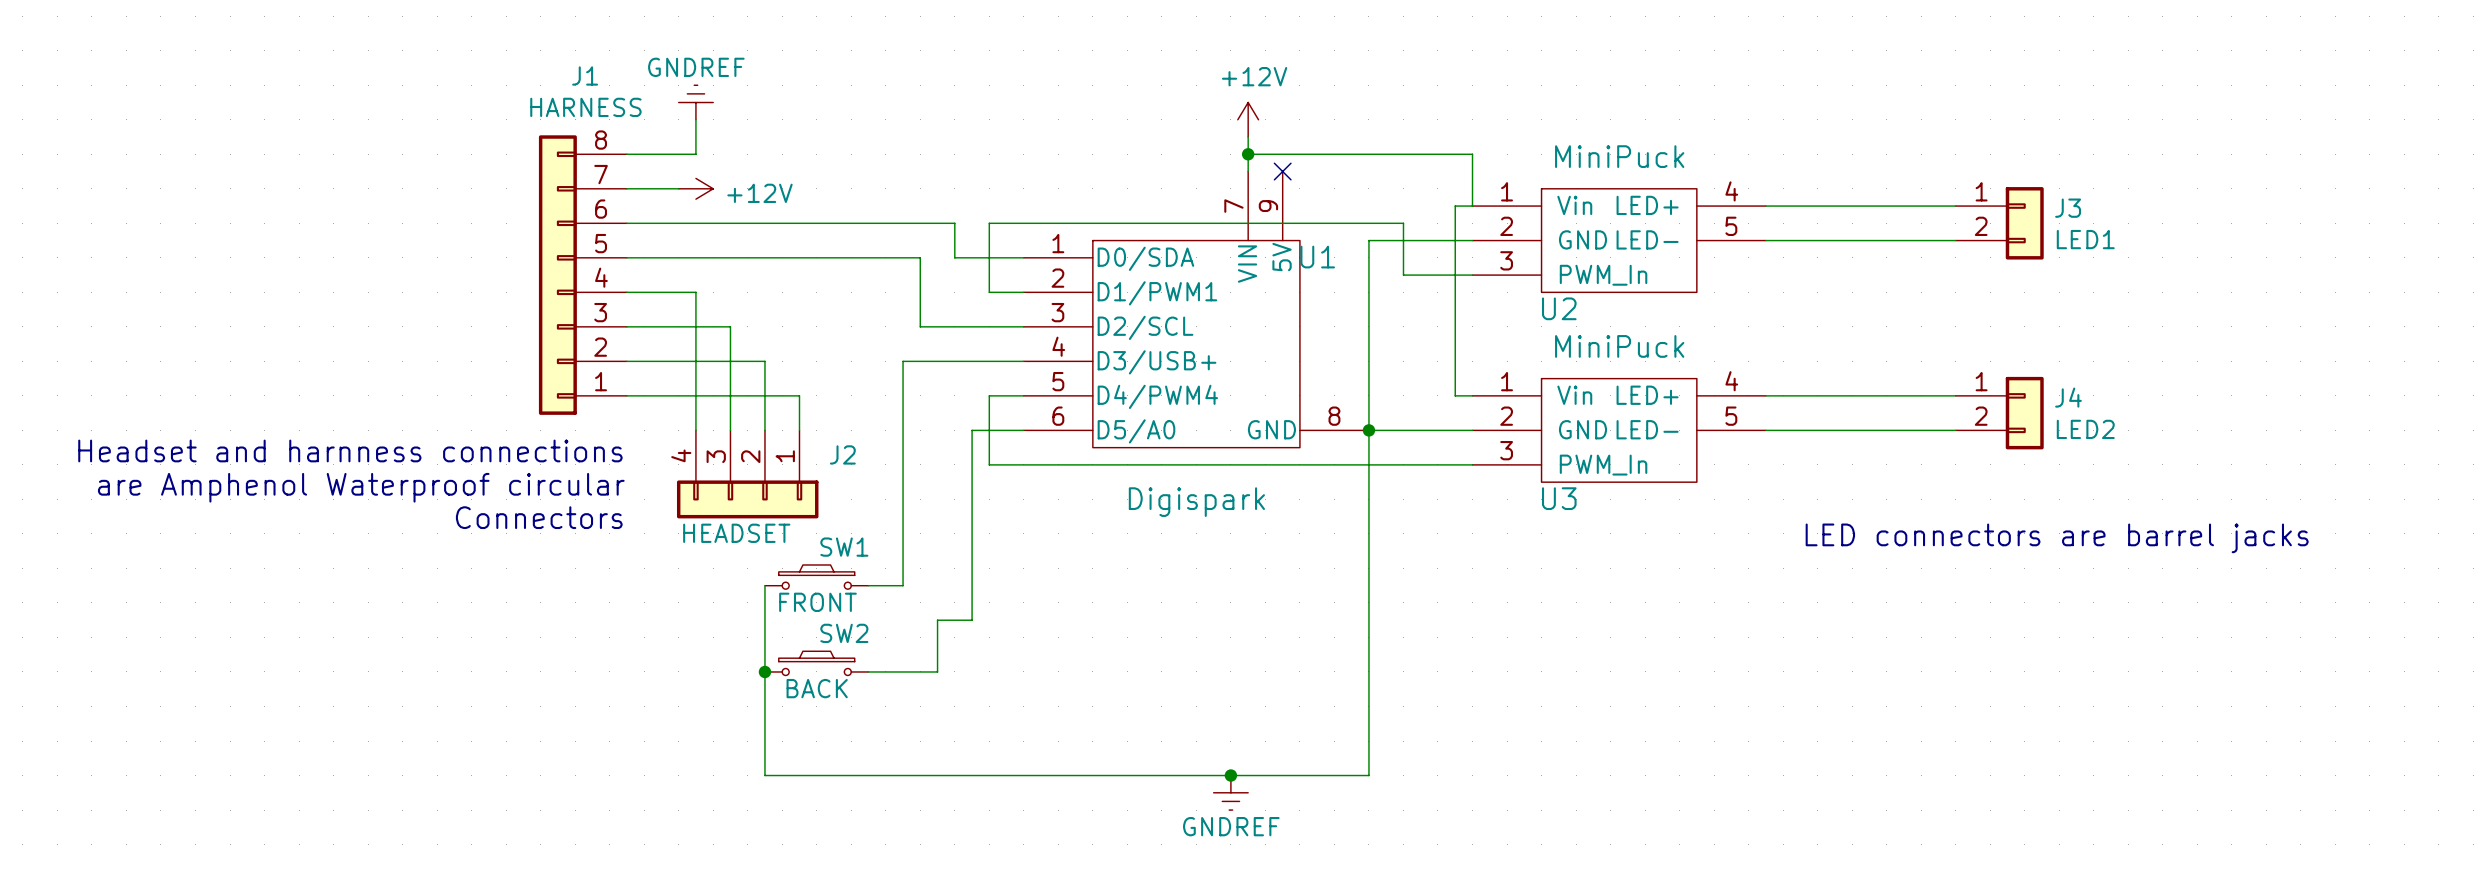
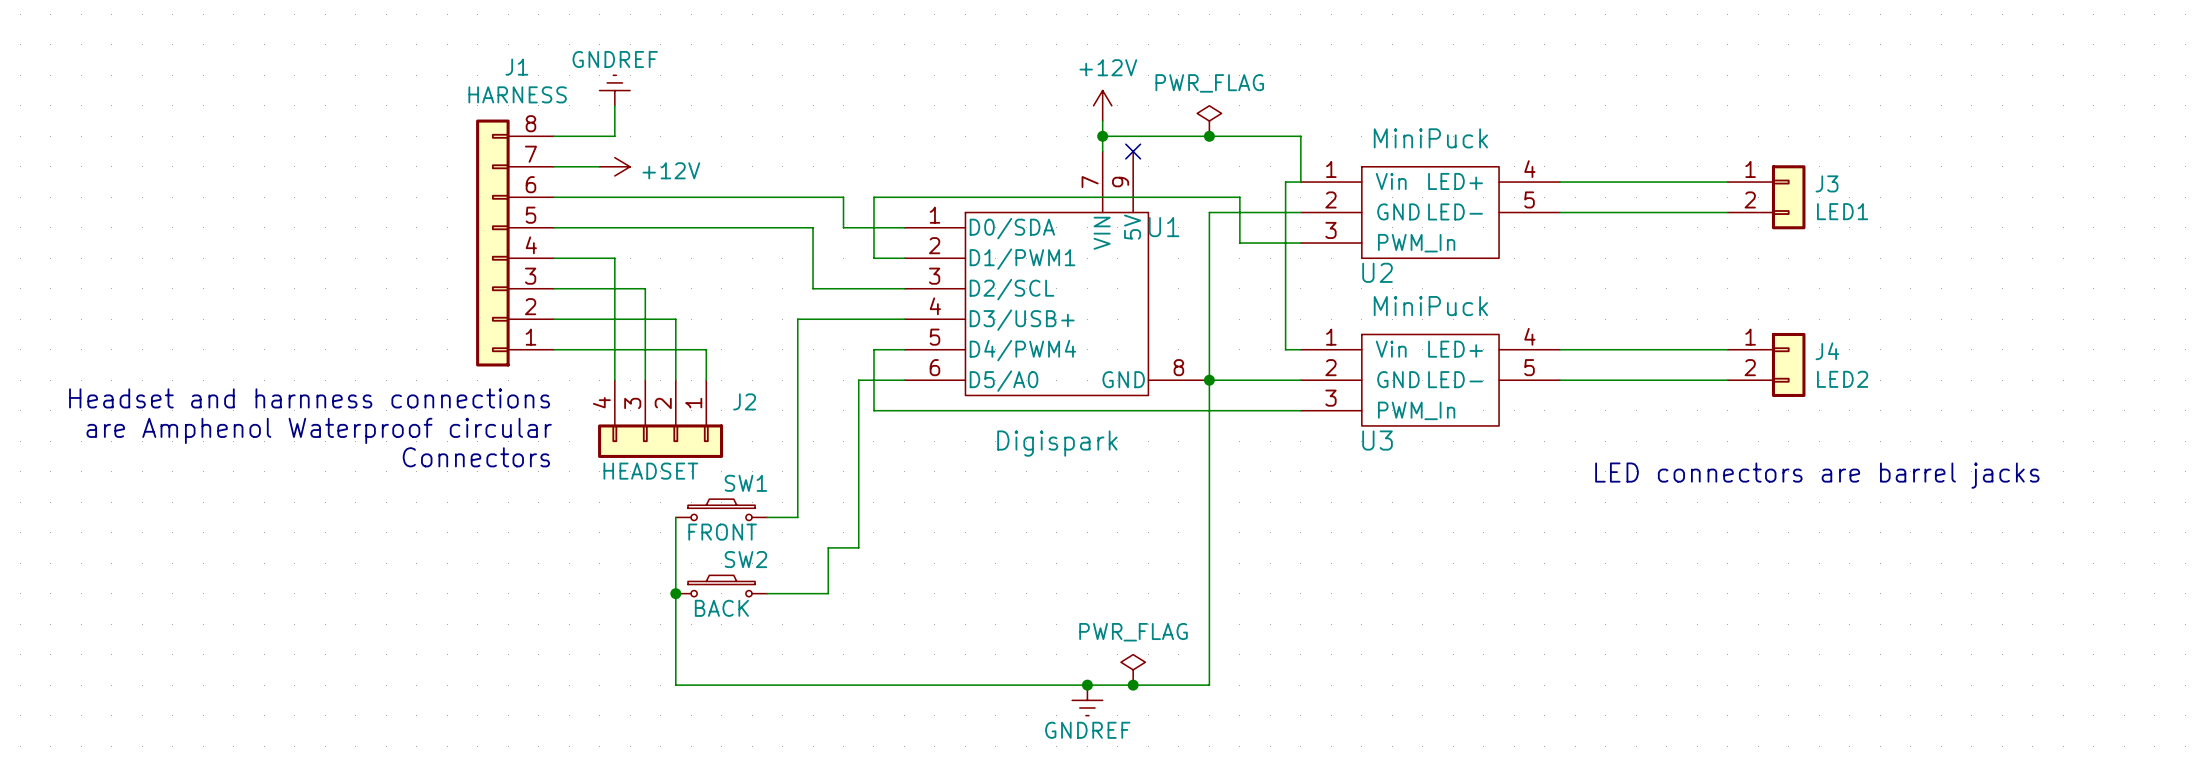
power symbol: none -> PWR_FLAG (1209, 121)
junction: none -> (1209, 136)
power symbol: none -> PWR_FLAG (1133, 669)
junction: none -> (1133, 685)

